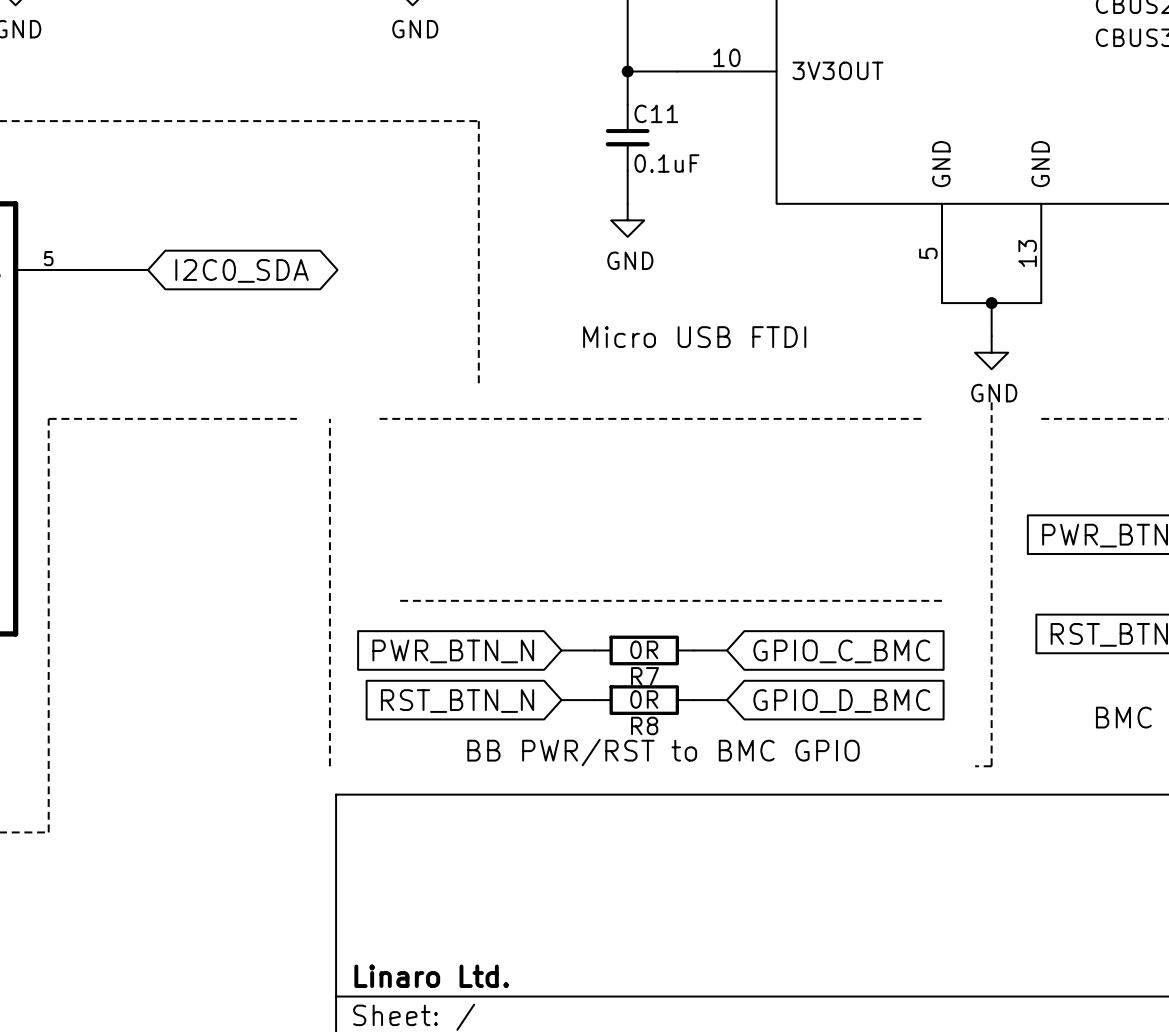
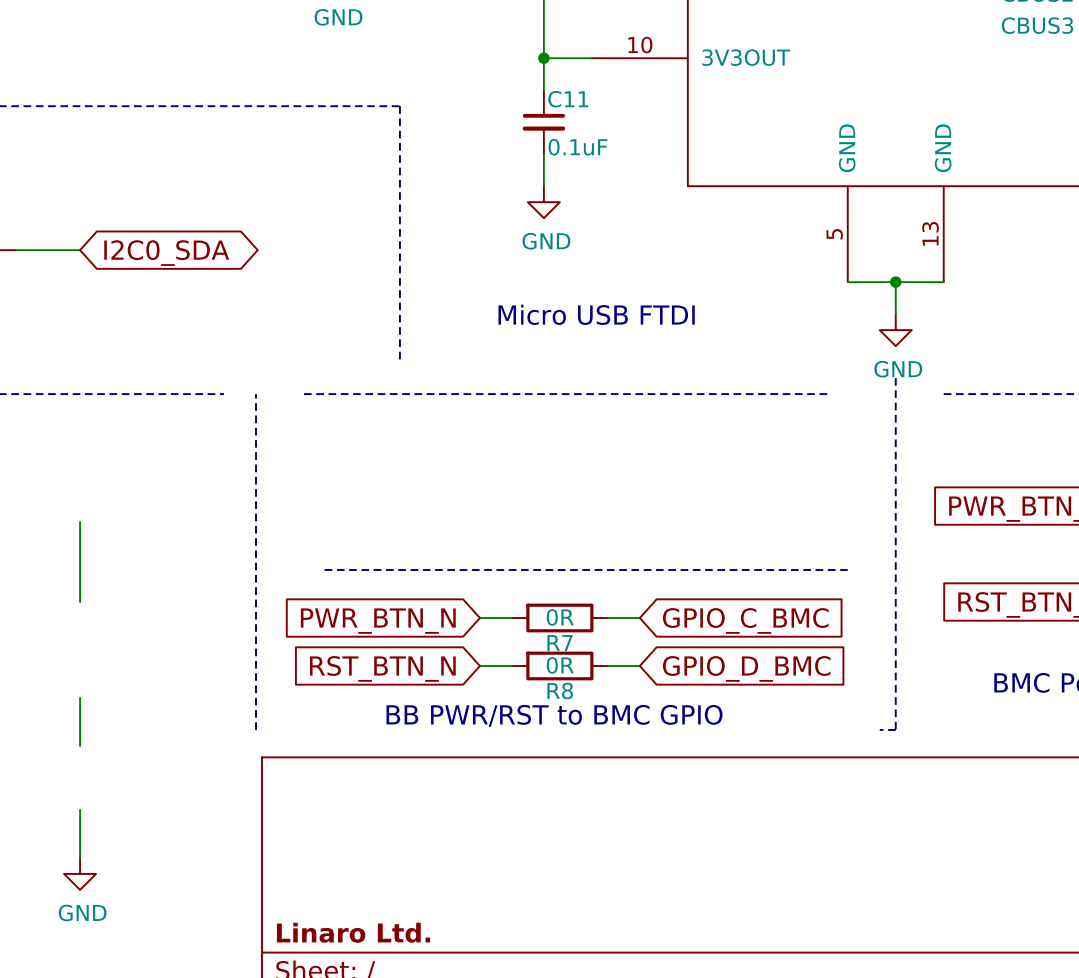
wire: none -> (80, 522) (80, 602)
wire: none -> (80, 697) (80, 745)
wire: none -> (80, 809) (80, 857)
power symbol: none -> GND (80, 873)

